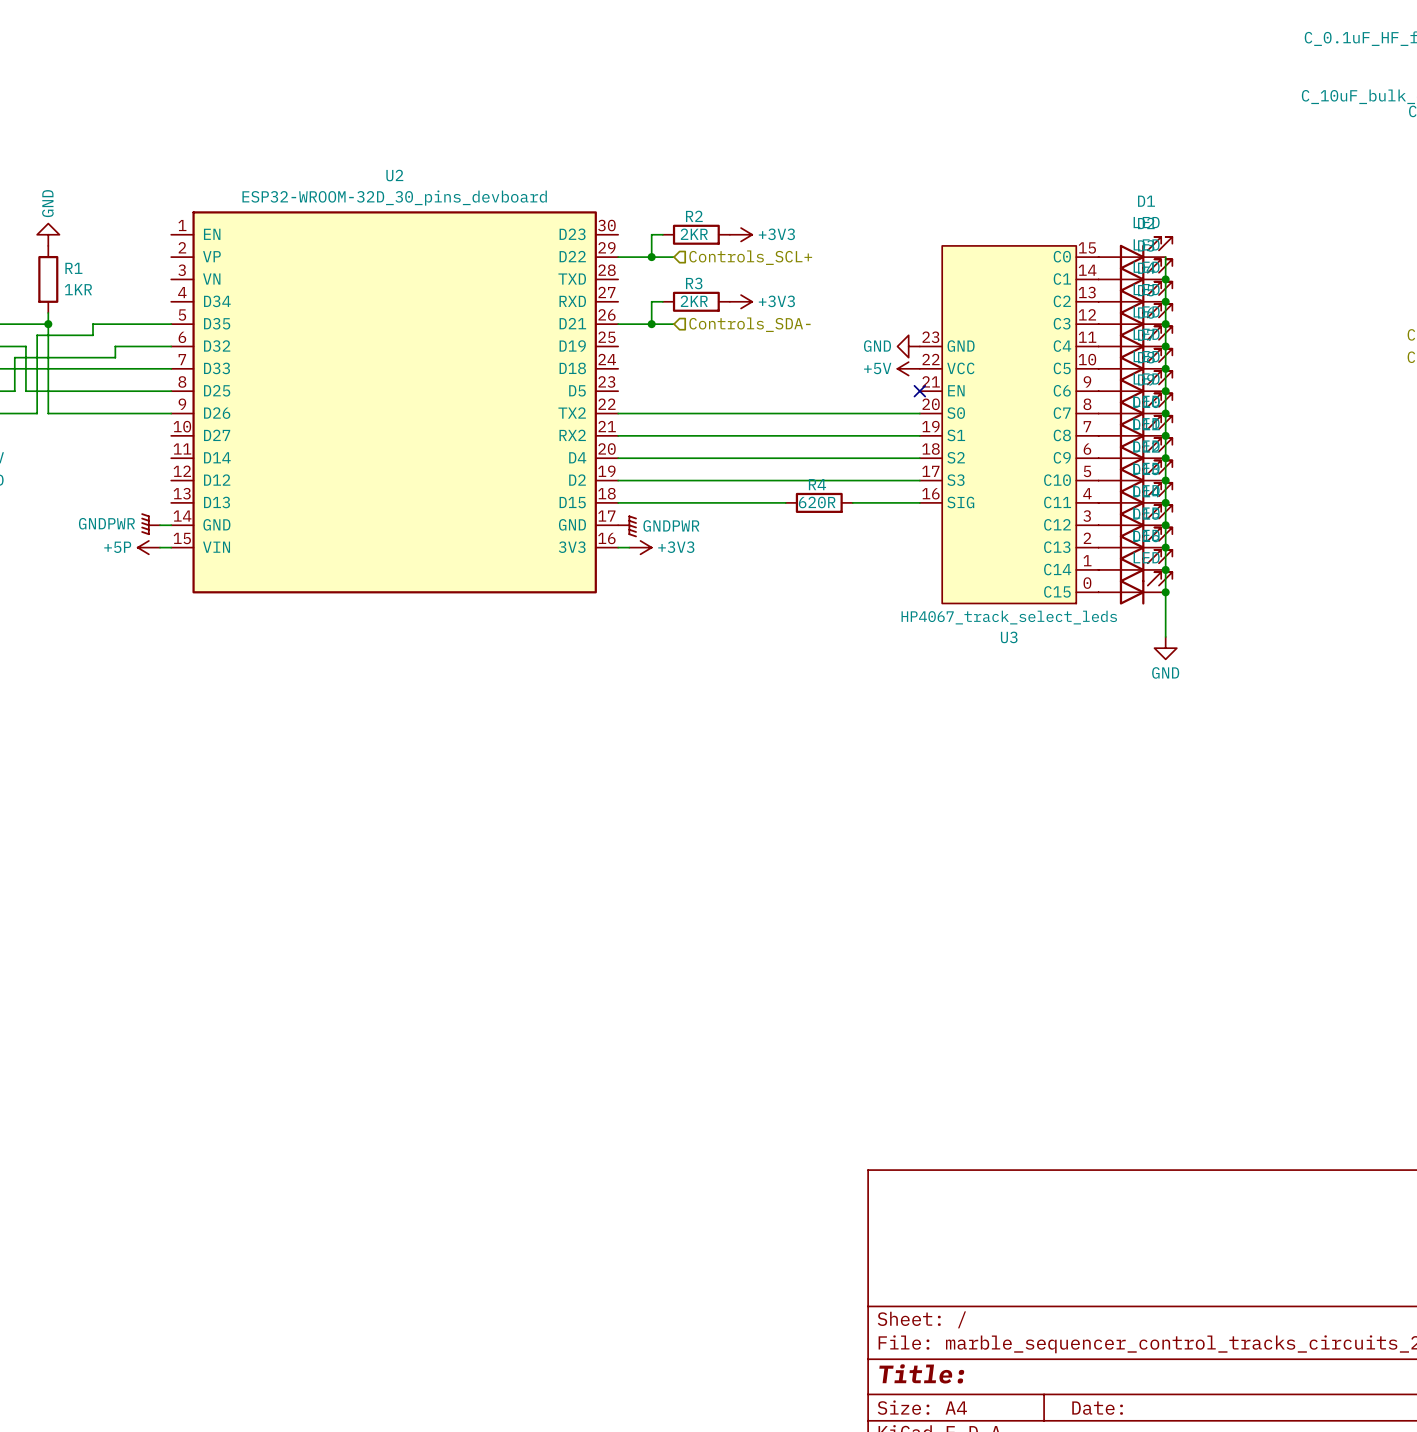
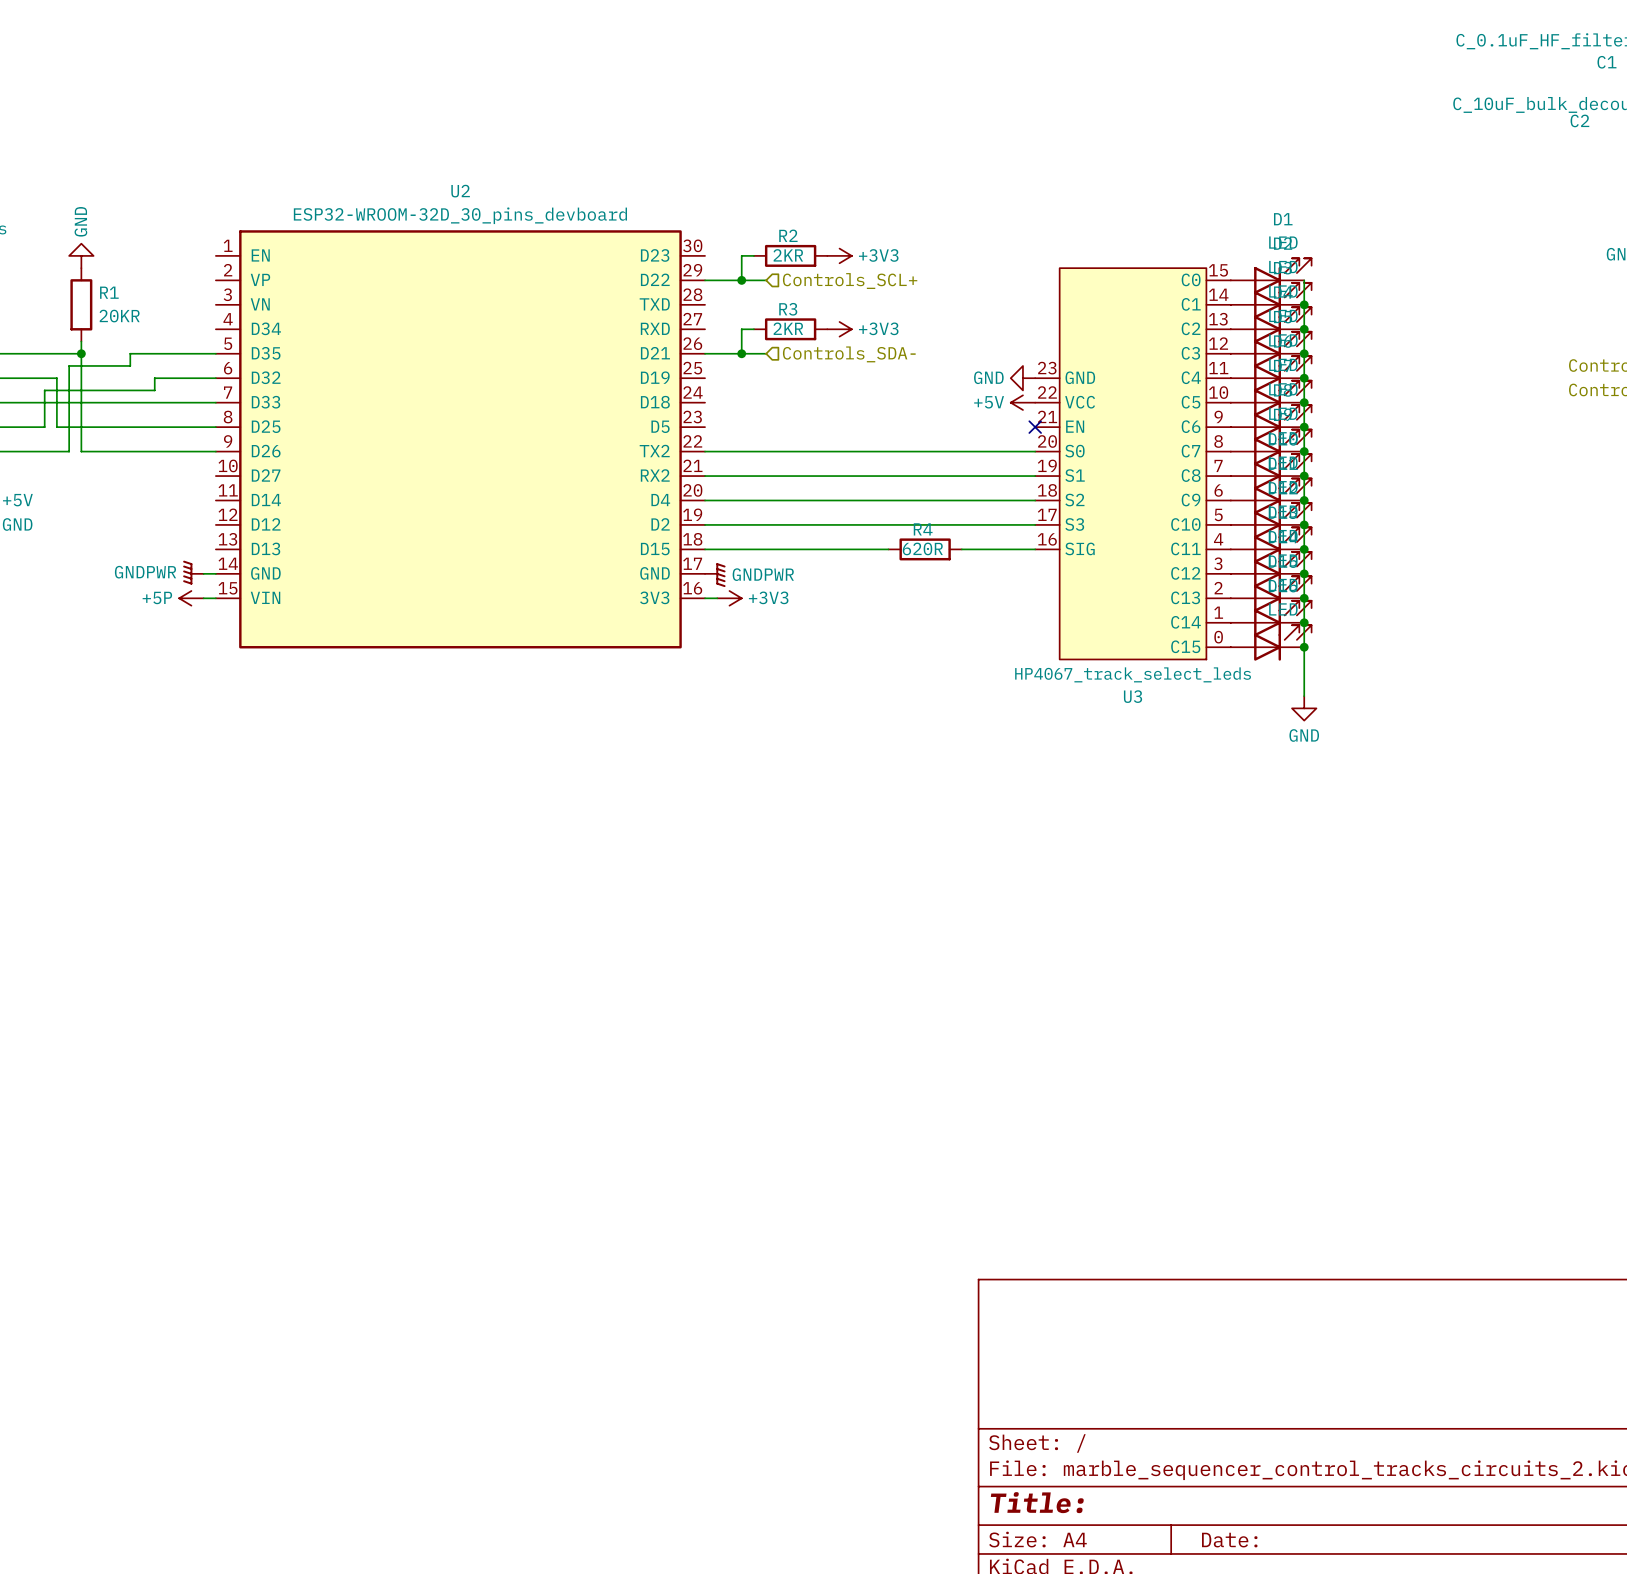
R1 value: 1KR (78, 289) -> 20KR (119, 316)

